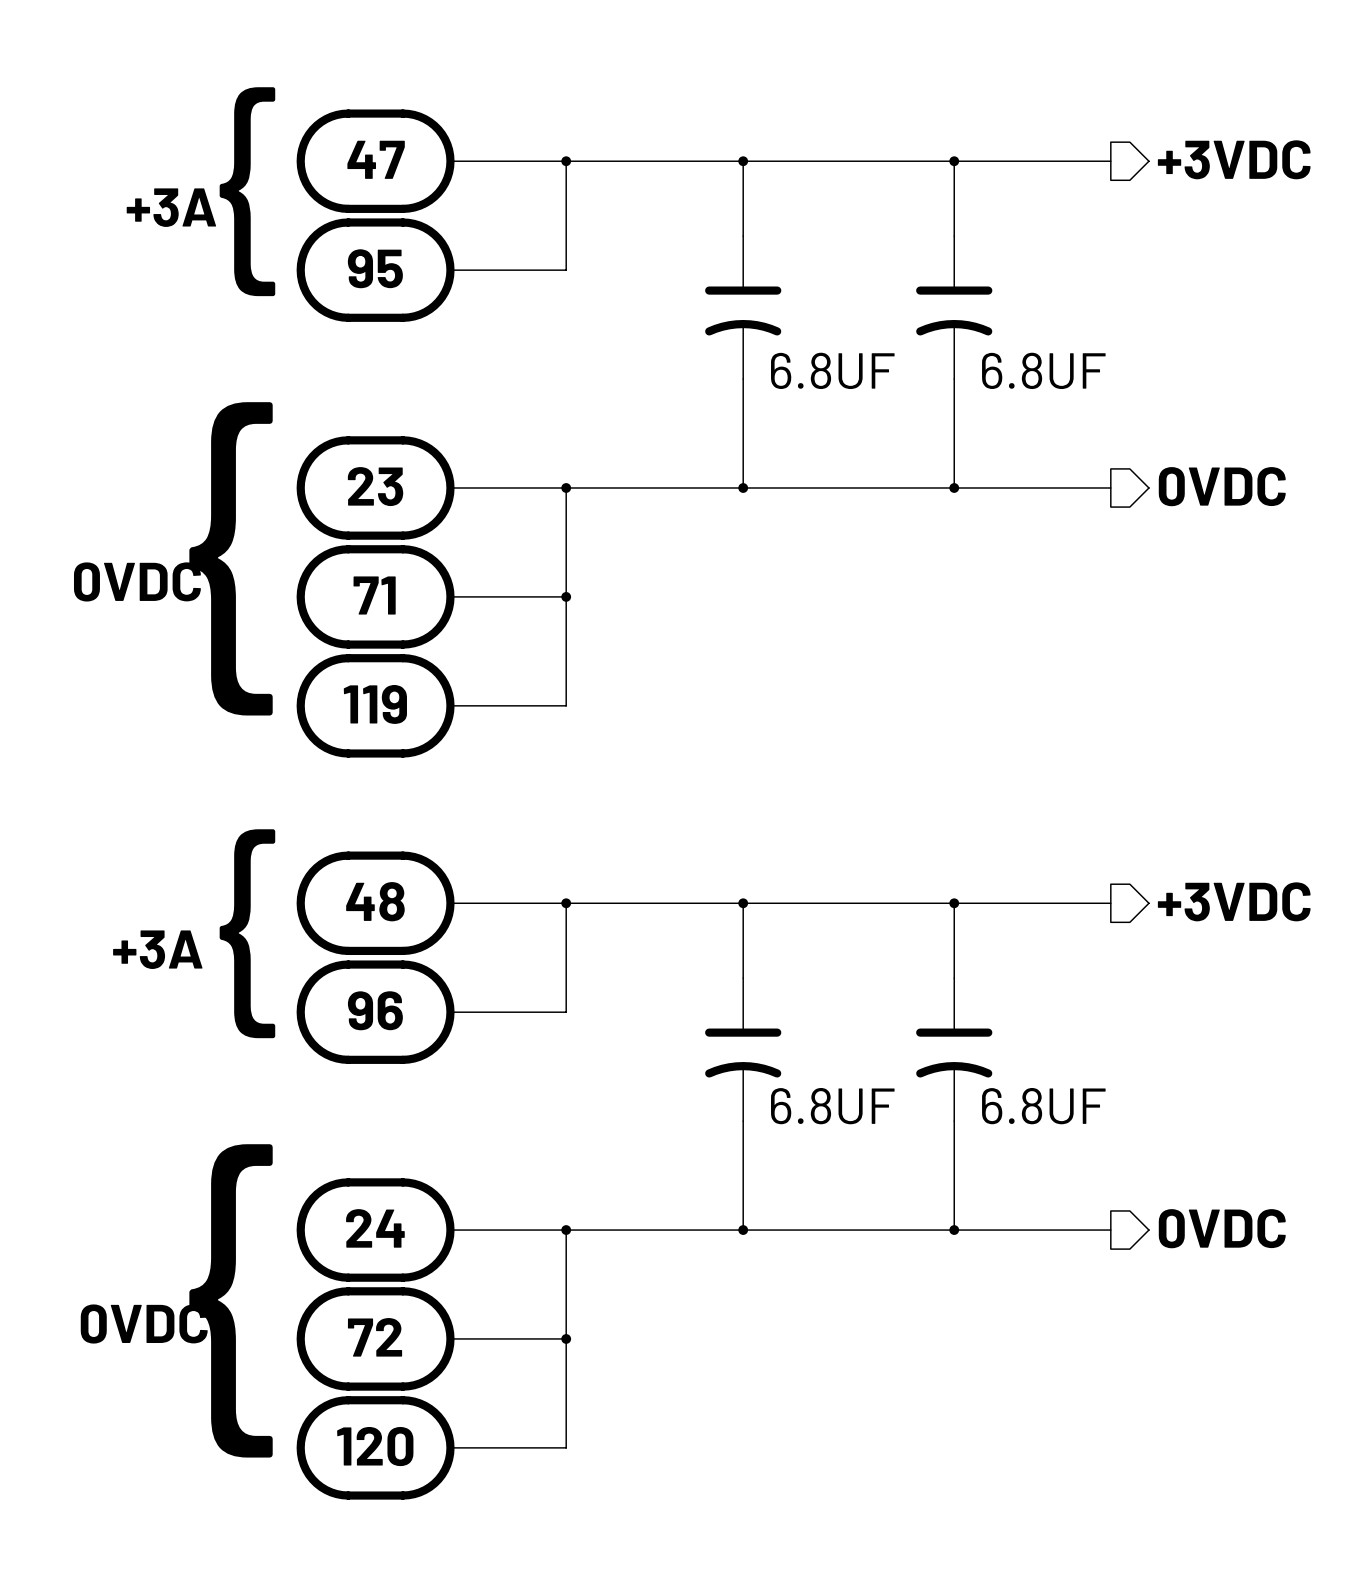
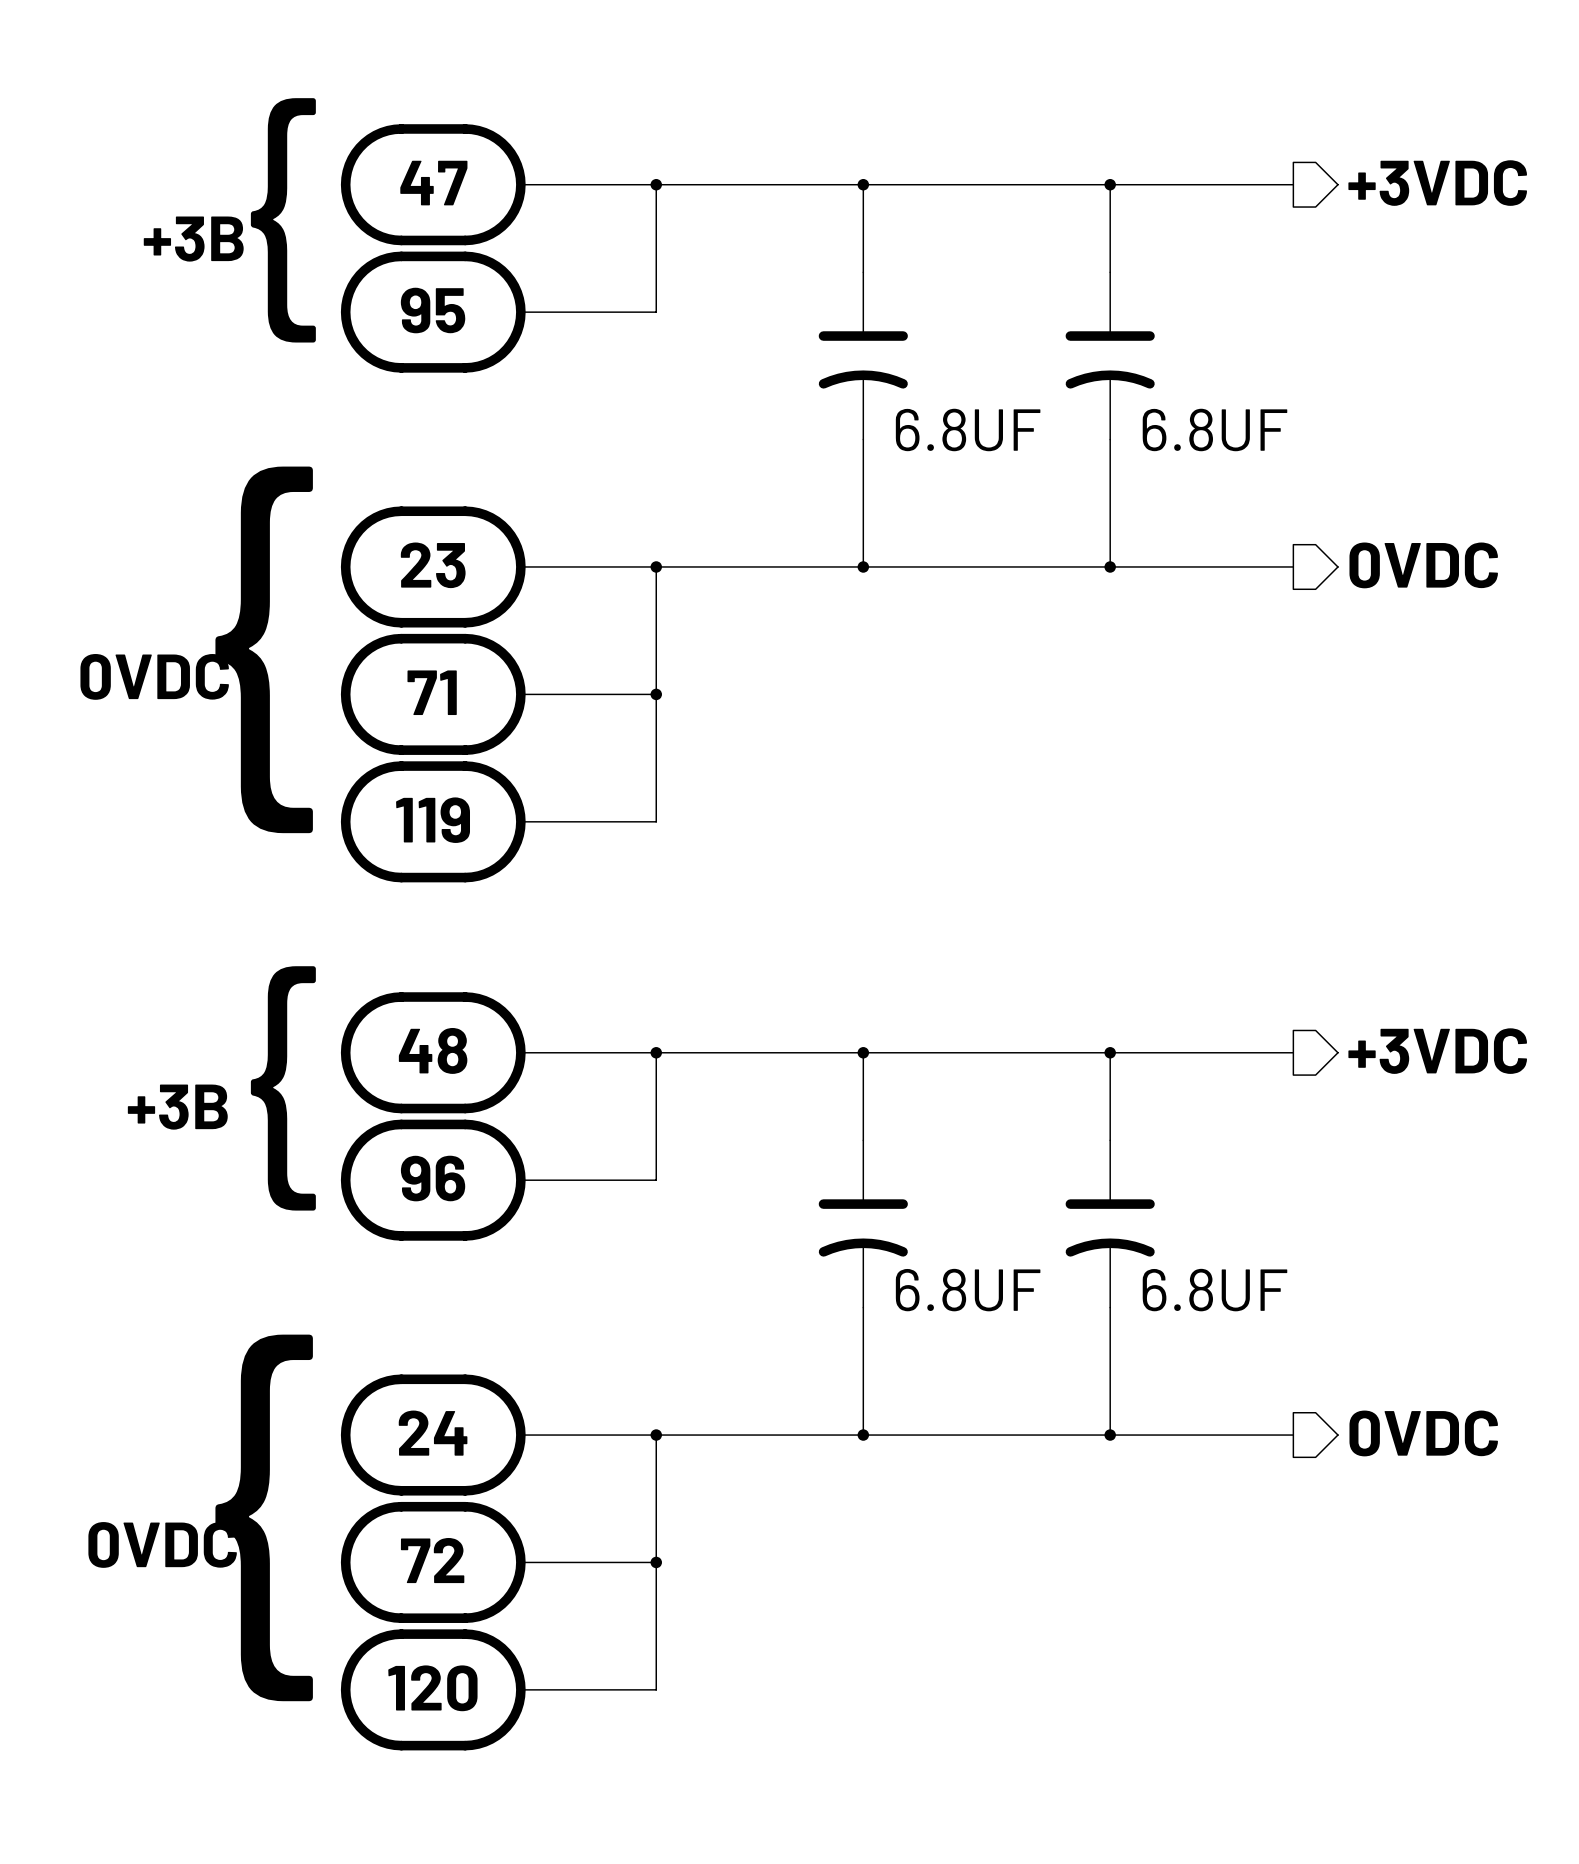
part text: +3A (171, 207) -> +3B (193, 239)
part text: +3A (157, 949) -> +3B (177, 1107)

